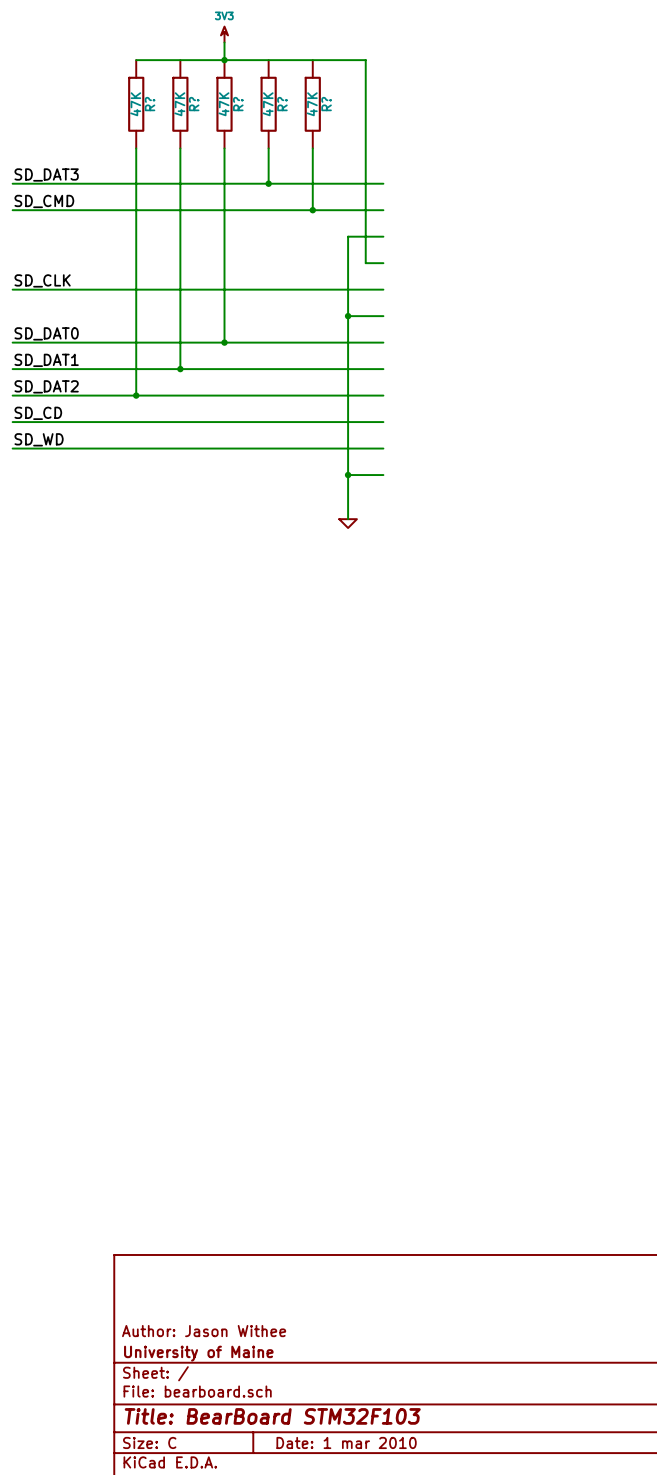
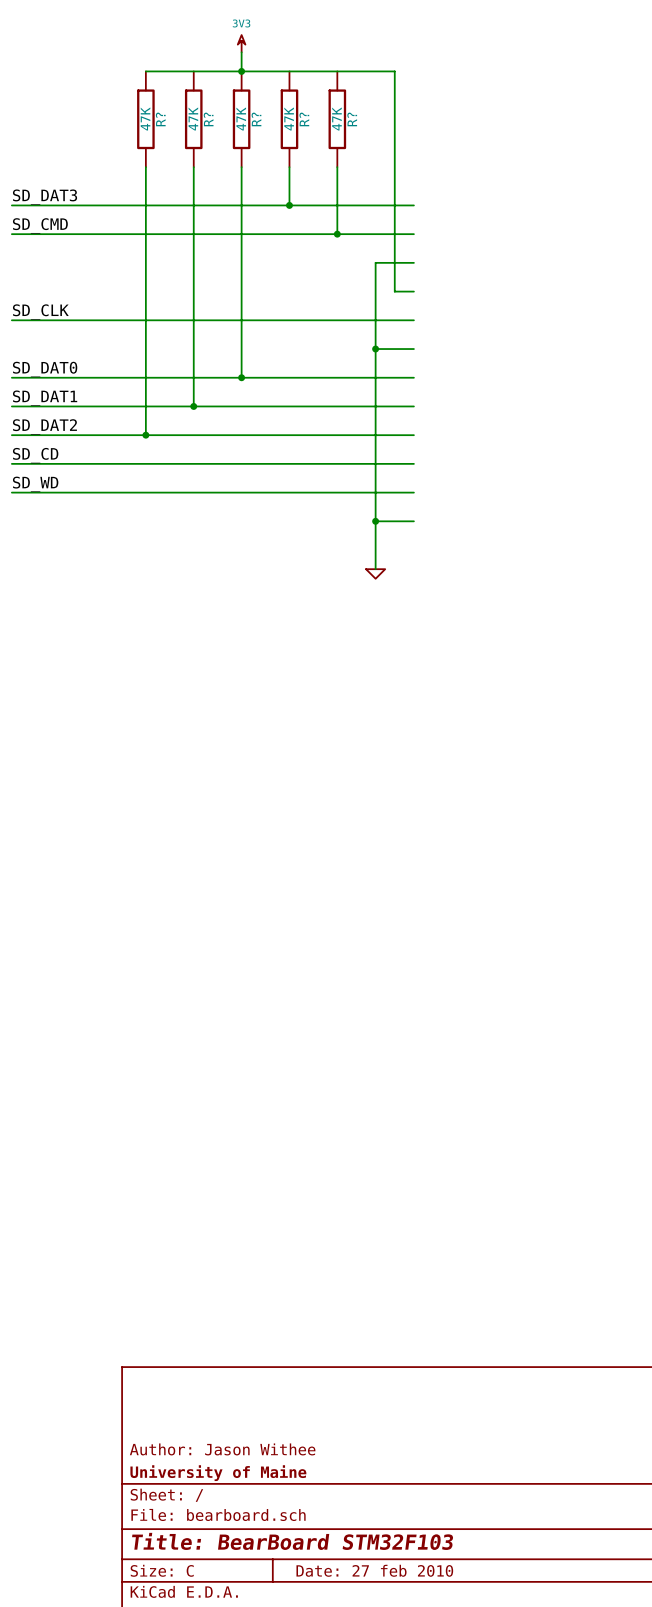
title block: Date: 1 mar 2010 (346, 1442) -> Date: 27 feb 2010 (374, 1570)

